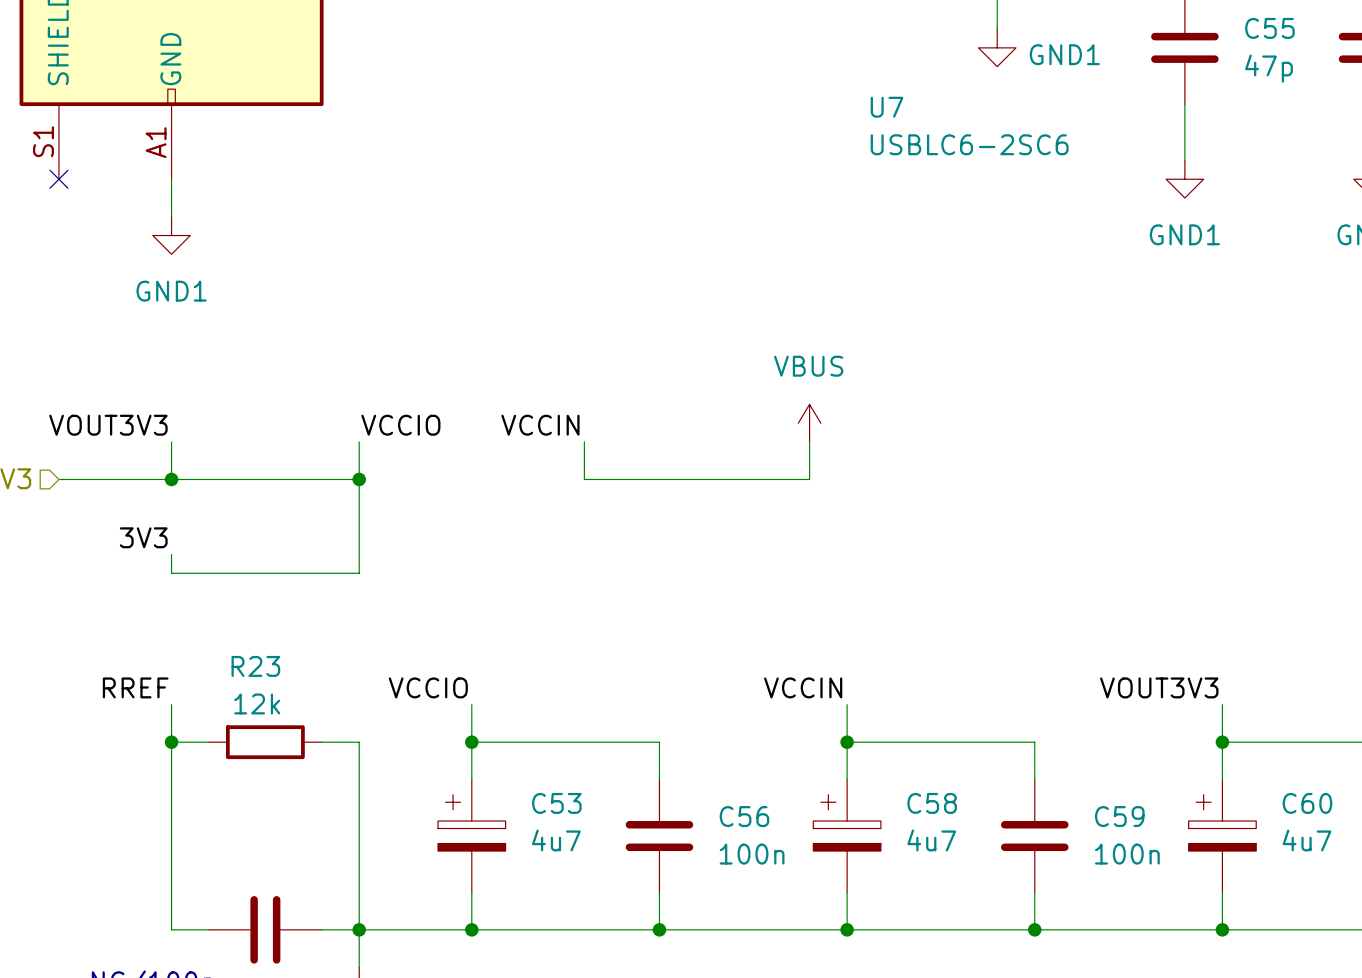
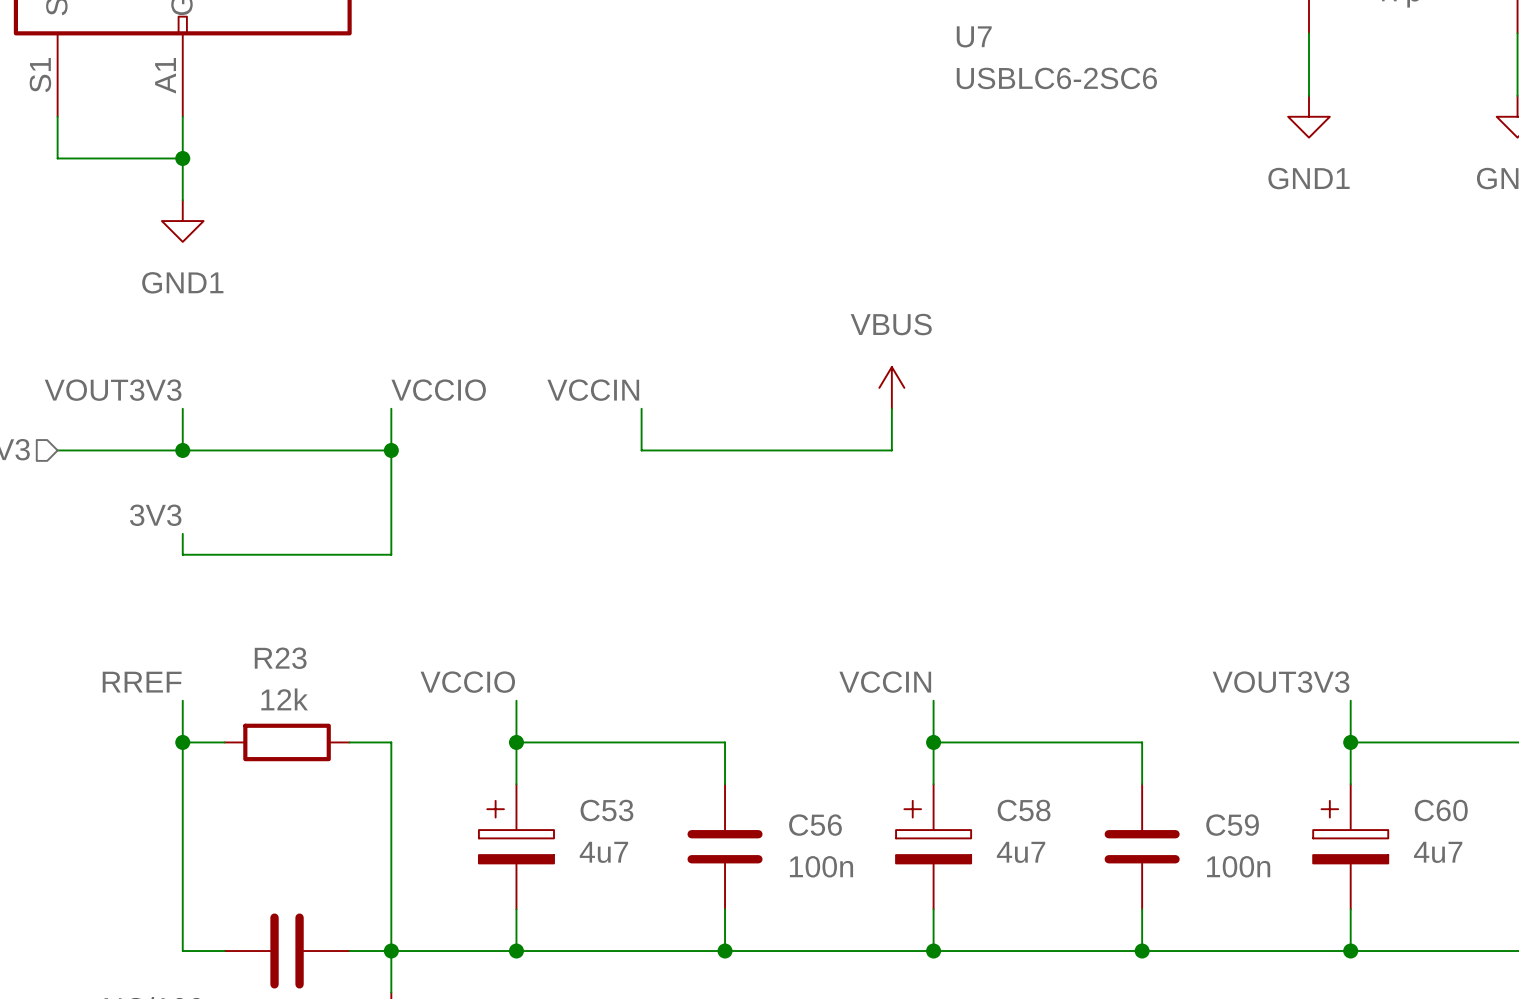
wire: none -> (57, 116) (57, 158) (182, 158) (182, 200)
no-connect mark: (58, 179) -> none
junction: none -> (182, 158)
power symbol position: GND1 (171, 235) -> GND1 (182, 221)

